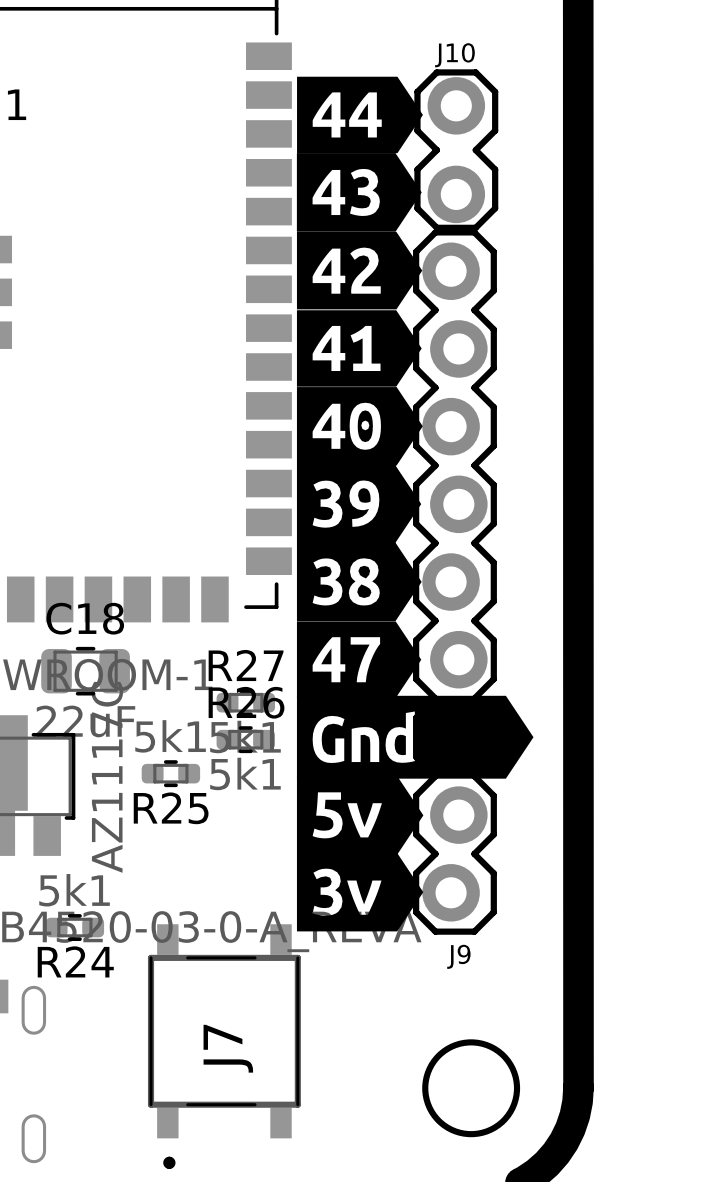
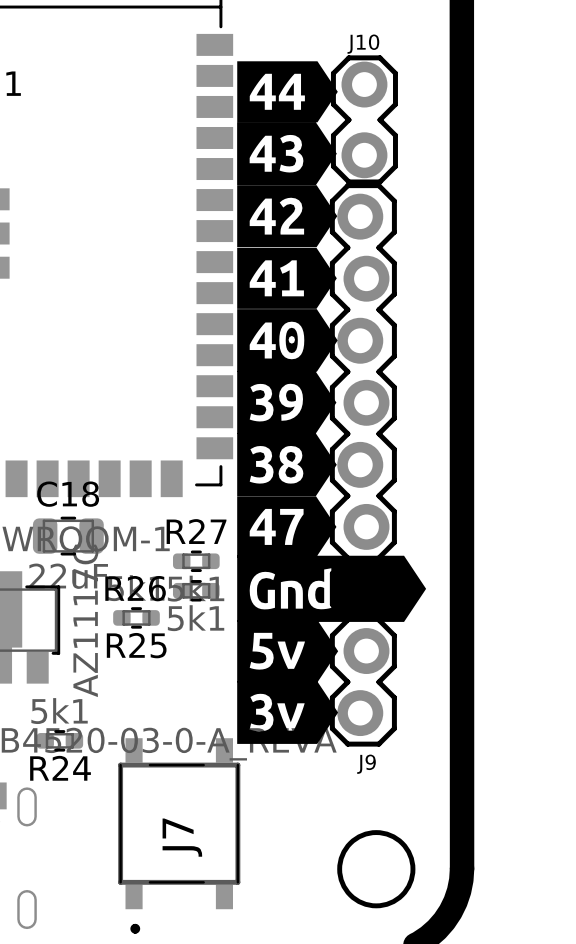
R26 name position: R26 (246, 702) -> R26 (135, 588)

